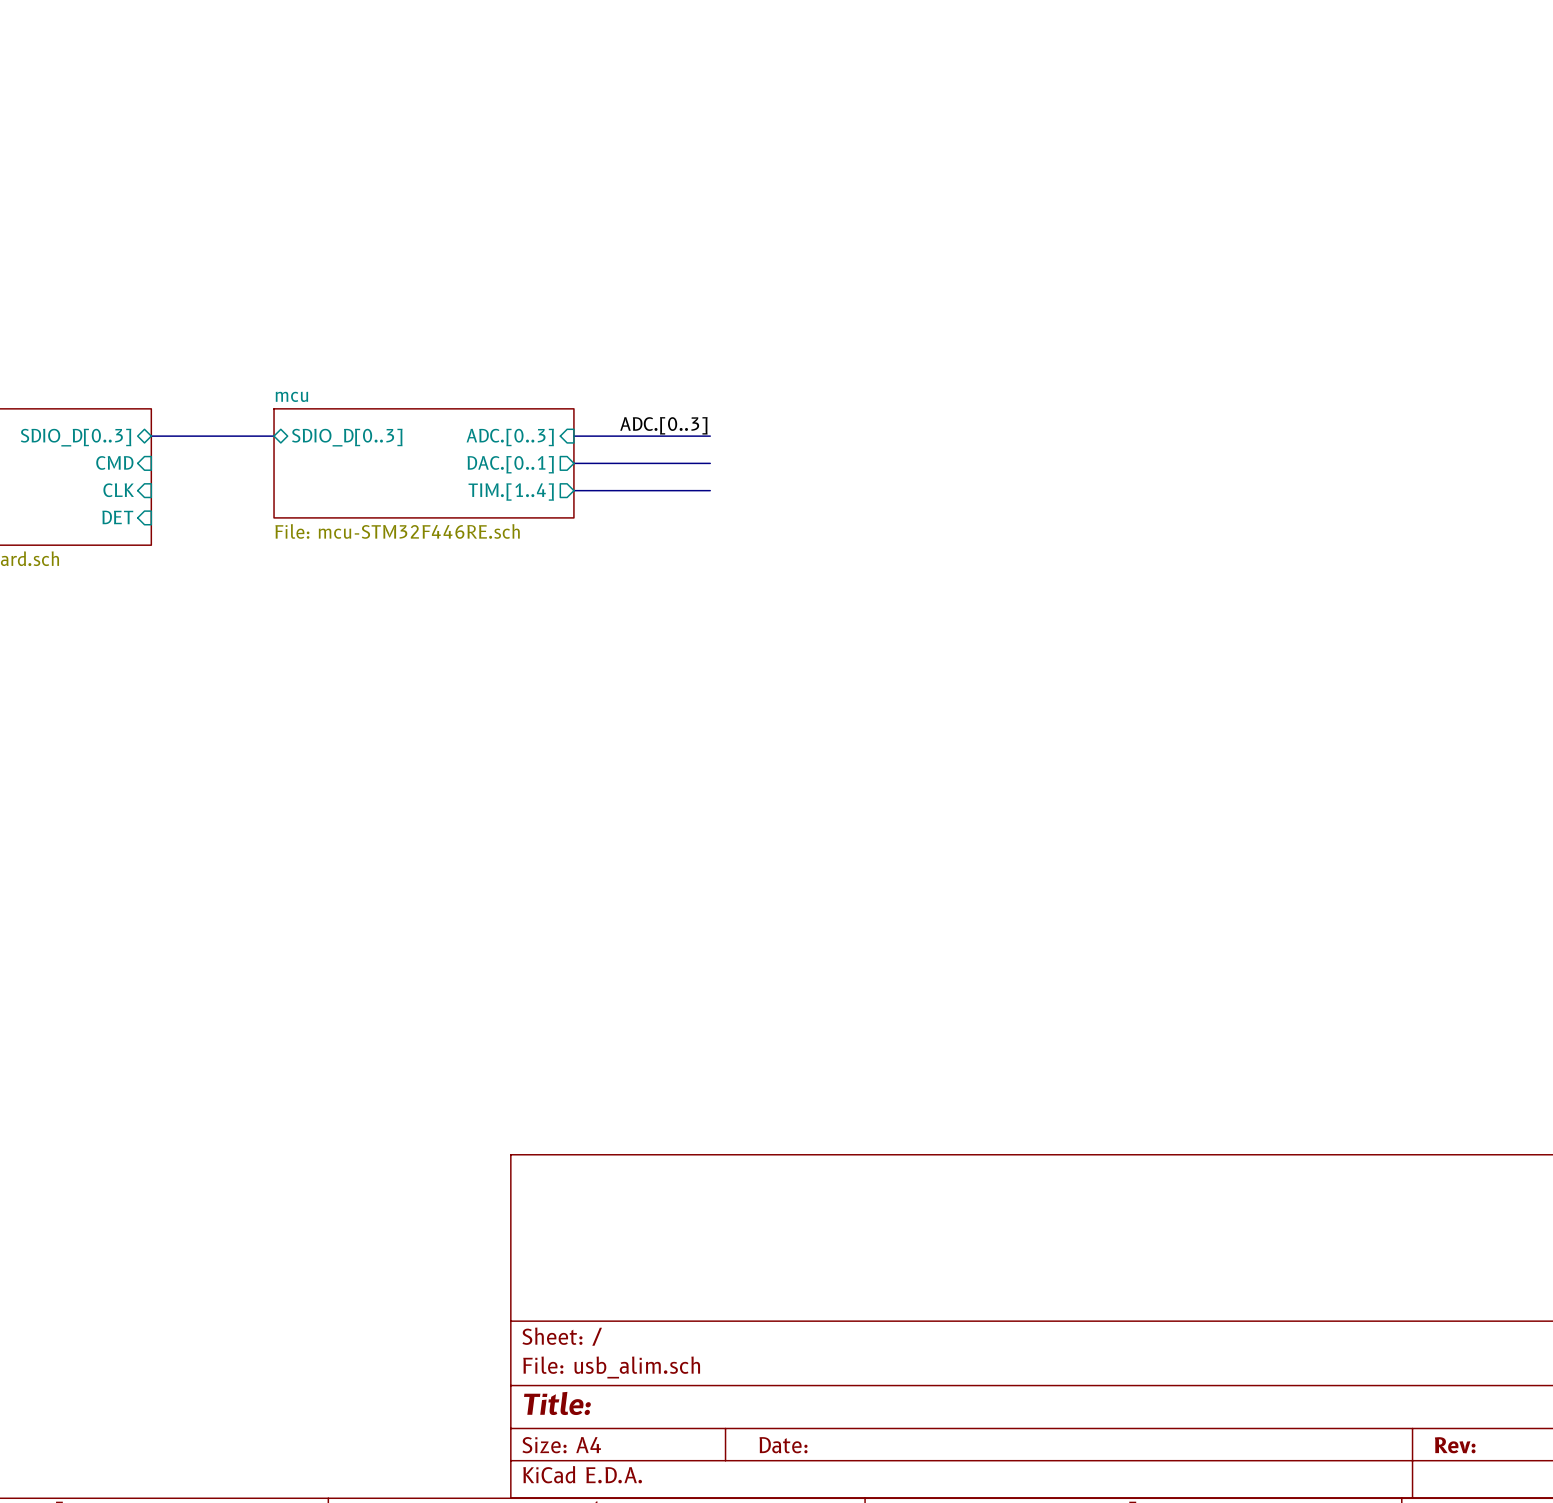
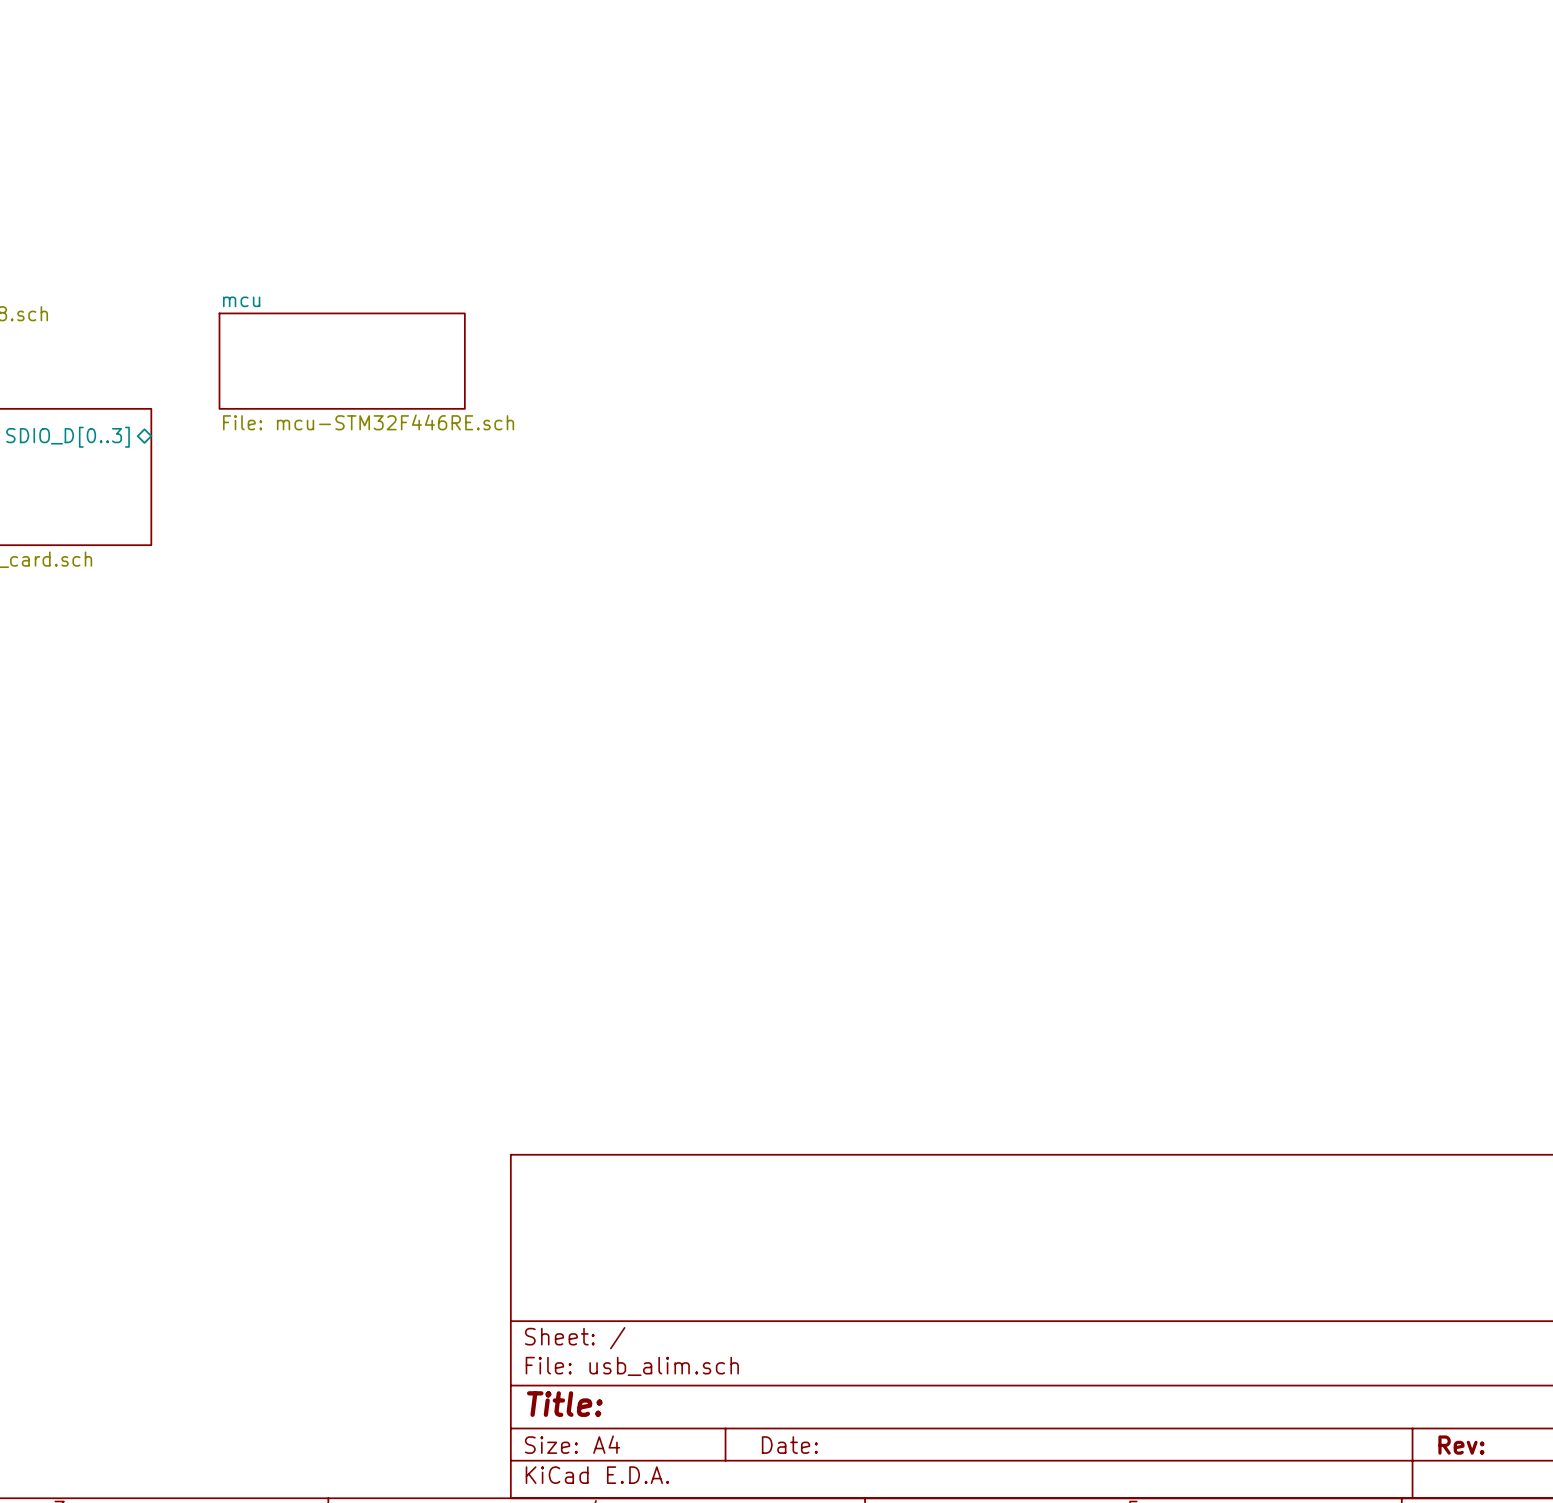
sheet mcu: none -> File: mcu-STM32F446RE.sch (342, 361)
label: ADC.[0..3] (663, 425) -> none
bus: (151, 436) (274, 436) -> none
bus: (573, 436) (710, 436) -> none
sheet pin: SDIO_D[0..3] (347, 437) -> none
sheet pin: ADC.[0..3] (510, 437) -> none
sheet pin: CMD (114, 462) -> none
sheet mcu: File: mcu-STM32F446RE.sch (423, 463) -> none
bus: (573, 463) (710, 463) -> none
sheet pin: DAC.[0..1] (510, 464) -> none
sheet pin: CLK (118, 490) -> none
bus: (573, 490) (710, 490) -> none
sheet pin: TIM.[1..4] (511, 492) -> none
sheet pin: DET (117, 517) -> none

